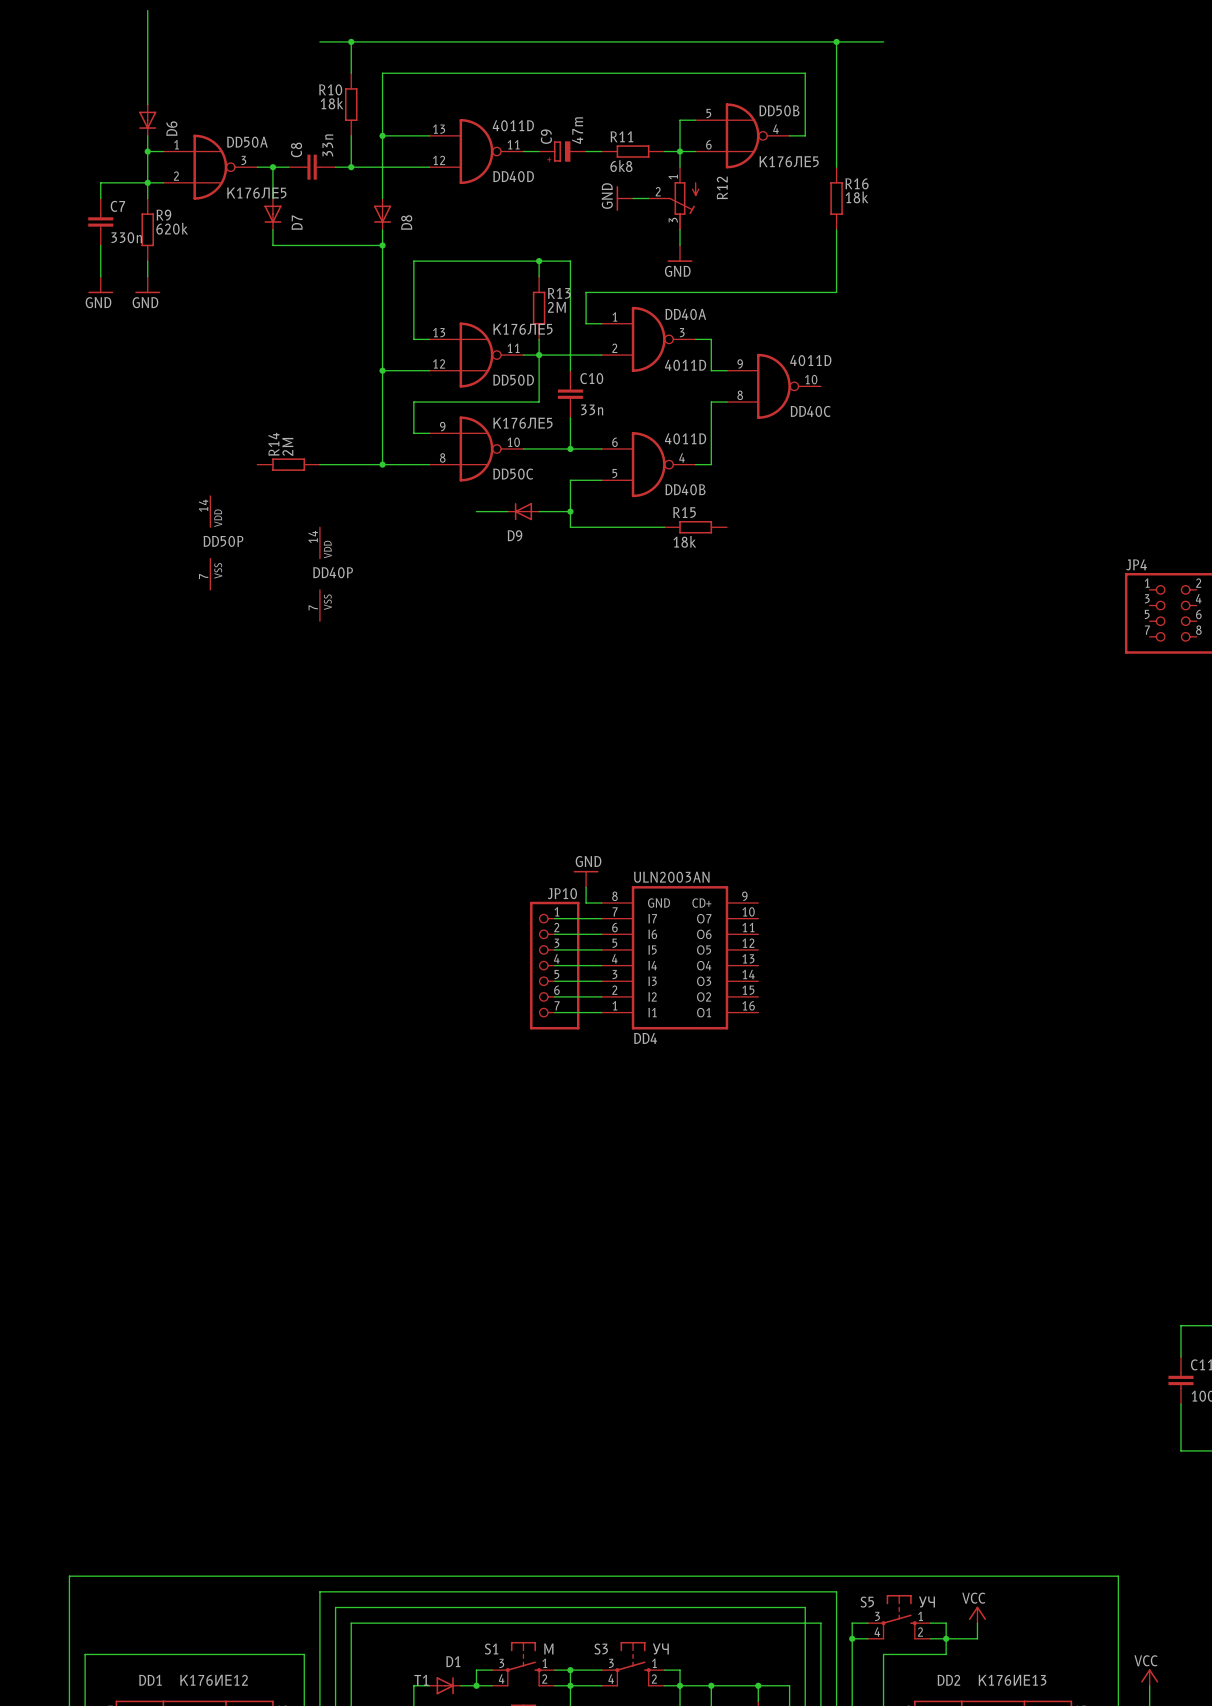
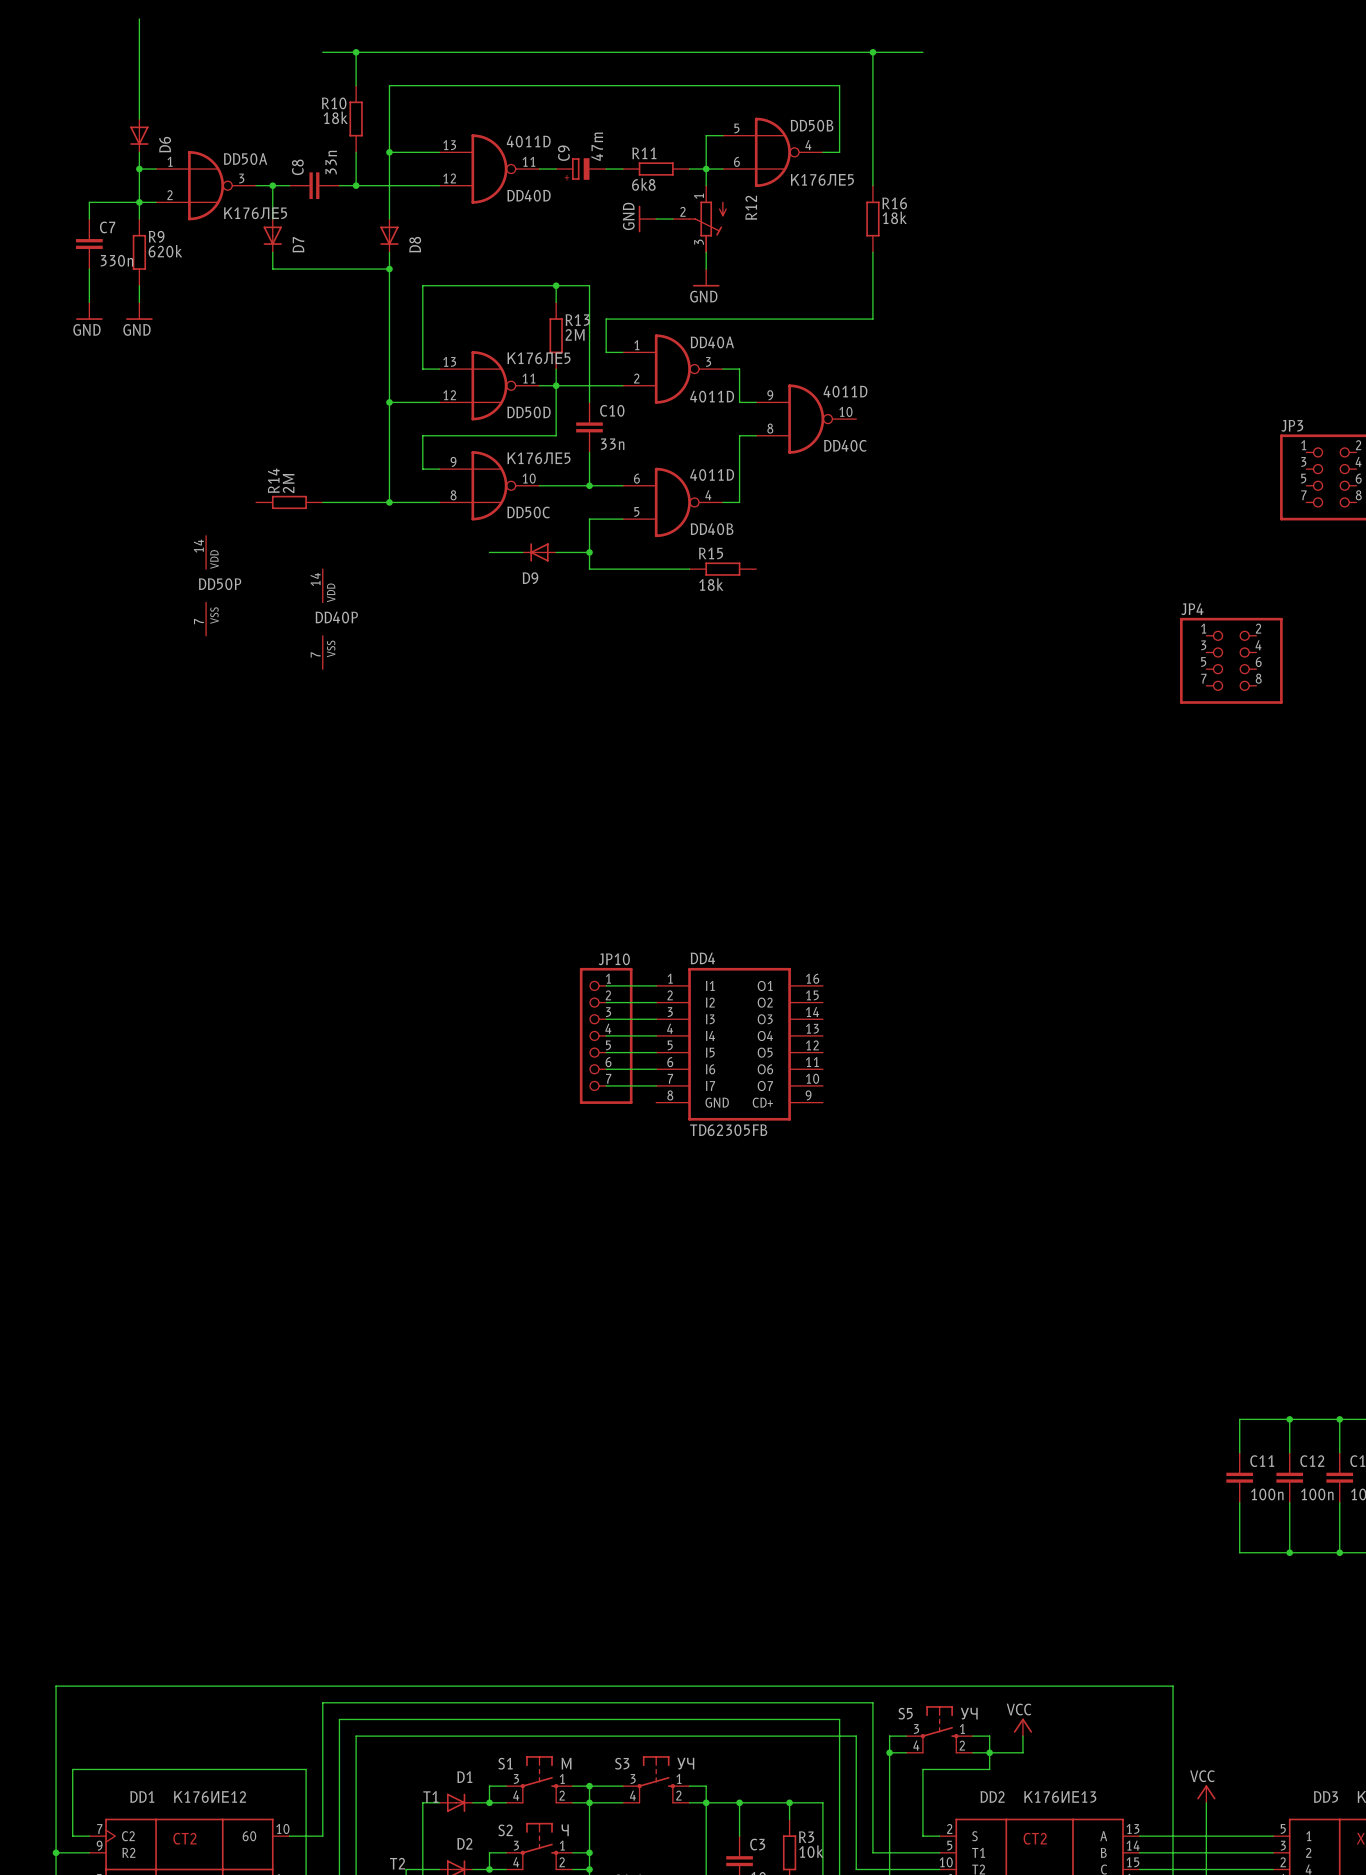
DD4 value: ULN2003AN (671, 877) -> TD62305FB (728, 1130)
power symbol: GND (586, 879) -> none
DD4 flip: as is (680, 957) -> up-down (739, 1044)
JP10 position: (554, 965) -> (606, 1035)

